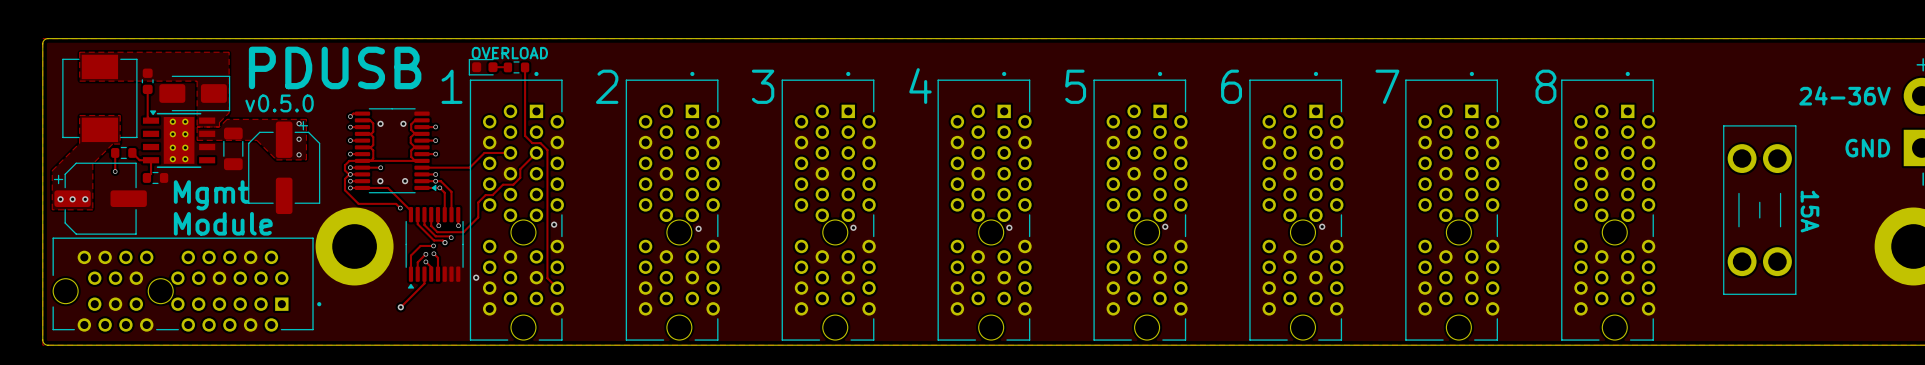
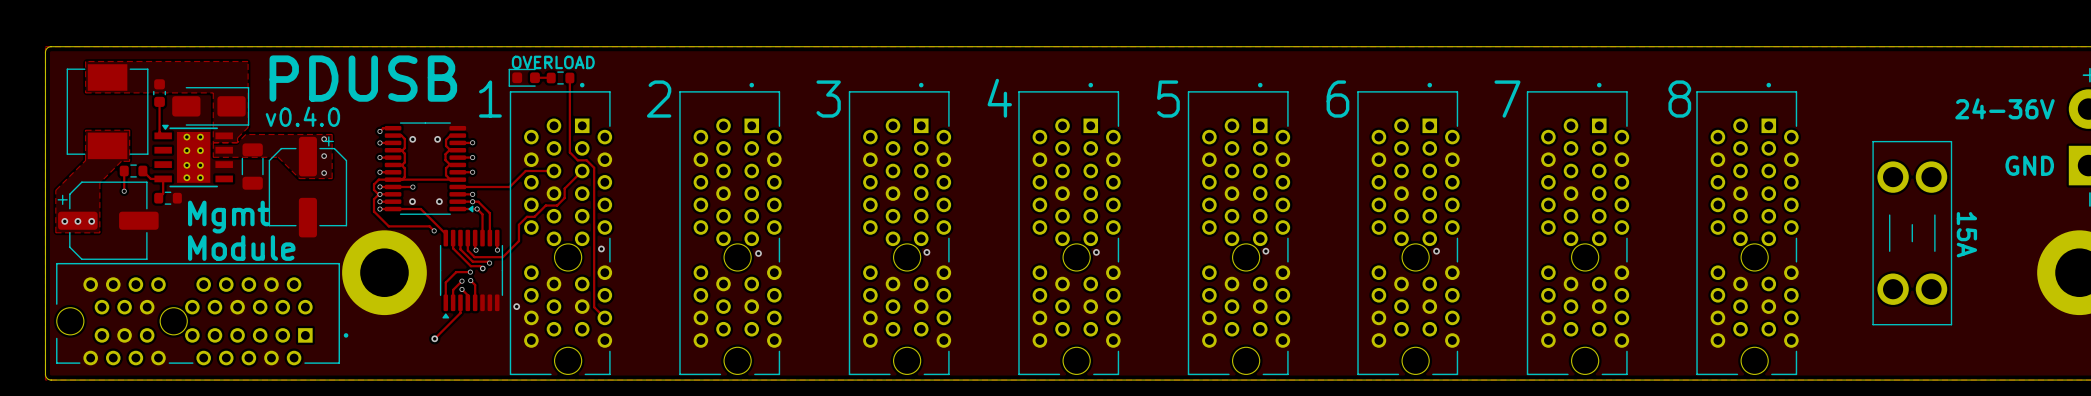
text: v0.5.0 (279, 103) -> v0.4.0 (302, 116)

